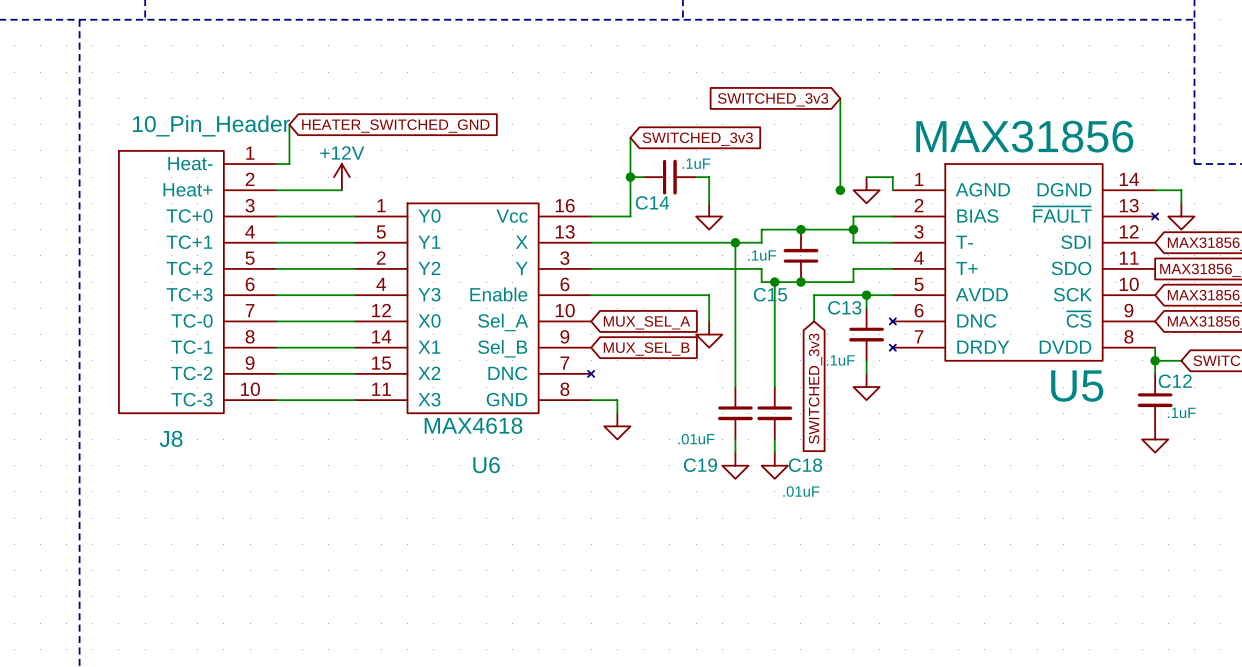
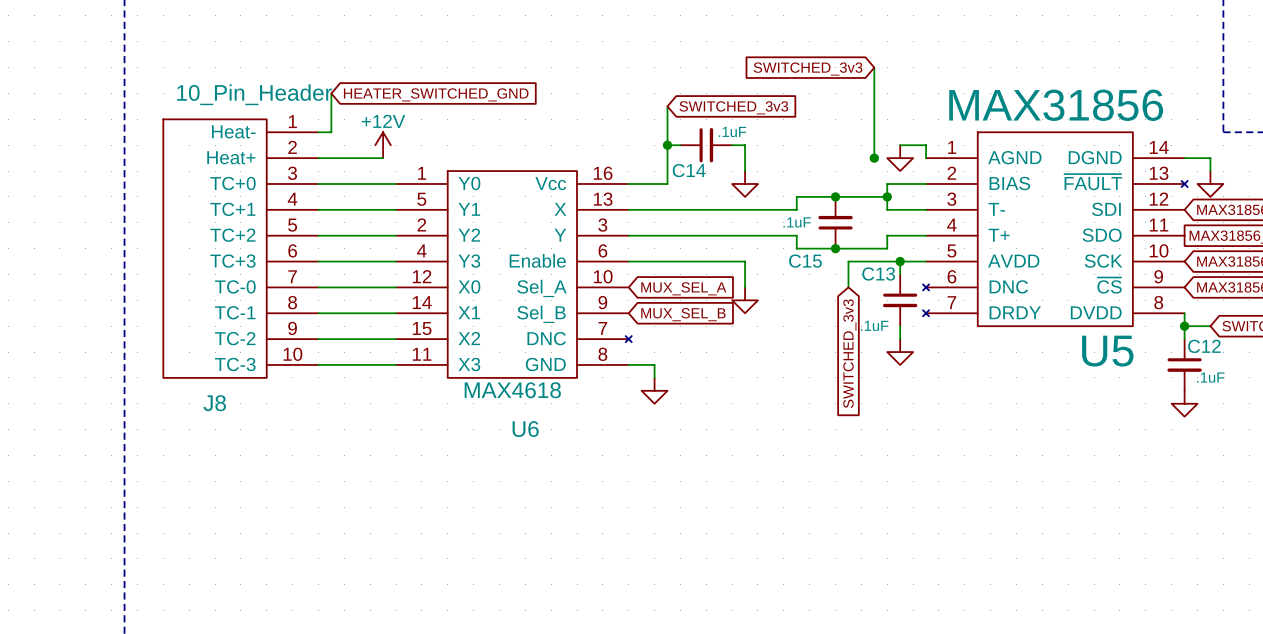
wire: (735, 242) (735, 387) -> none
junction: (735, 242) -> none
wire: (774, 282) (774, 387) -> none
junction: (774, 282) -> none
C19: (735, 413) -> none
C18: (774, 413) -> none
wire: (735, 439) (735, 452) -> none
wire: (774, 439) (774, 452) -> none
power symbol: (735, 465) -> none
power symbol: (774, 465) -> none

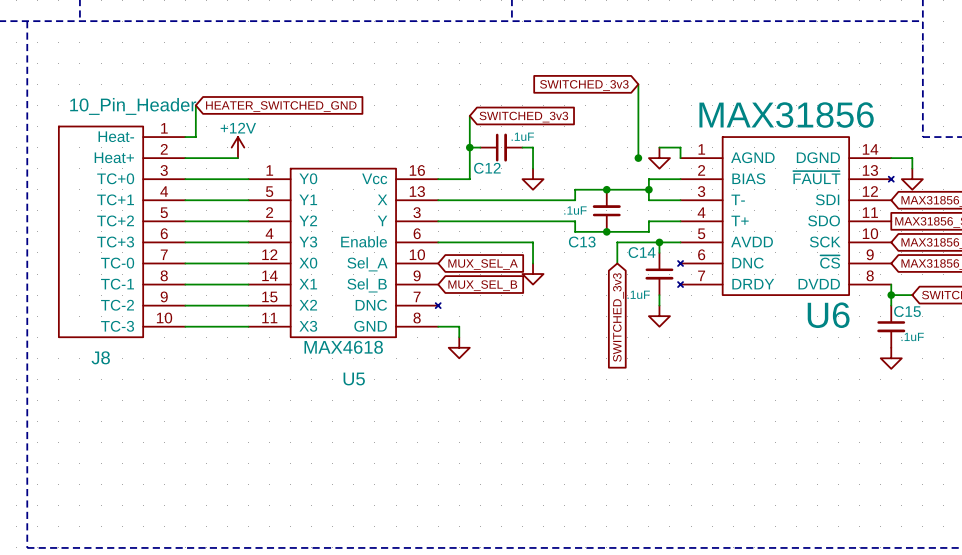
C14 name: C14 (689, 170) -> C12 (487, 168)
C15 name: C15 (805, 261) -> C13 (582, 242)
C13 name: C13 (878, 274) -> C14 (642, 252)
C12 name: C12 (1204, 346) -> C15 (907, 311)
U5 name: U5 (1107, 351) -> U6 (828, 315)
U6 name: U6 (525, 429) -> U5 (354, 379)

